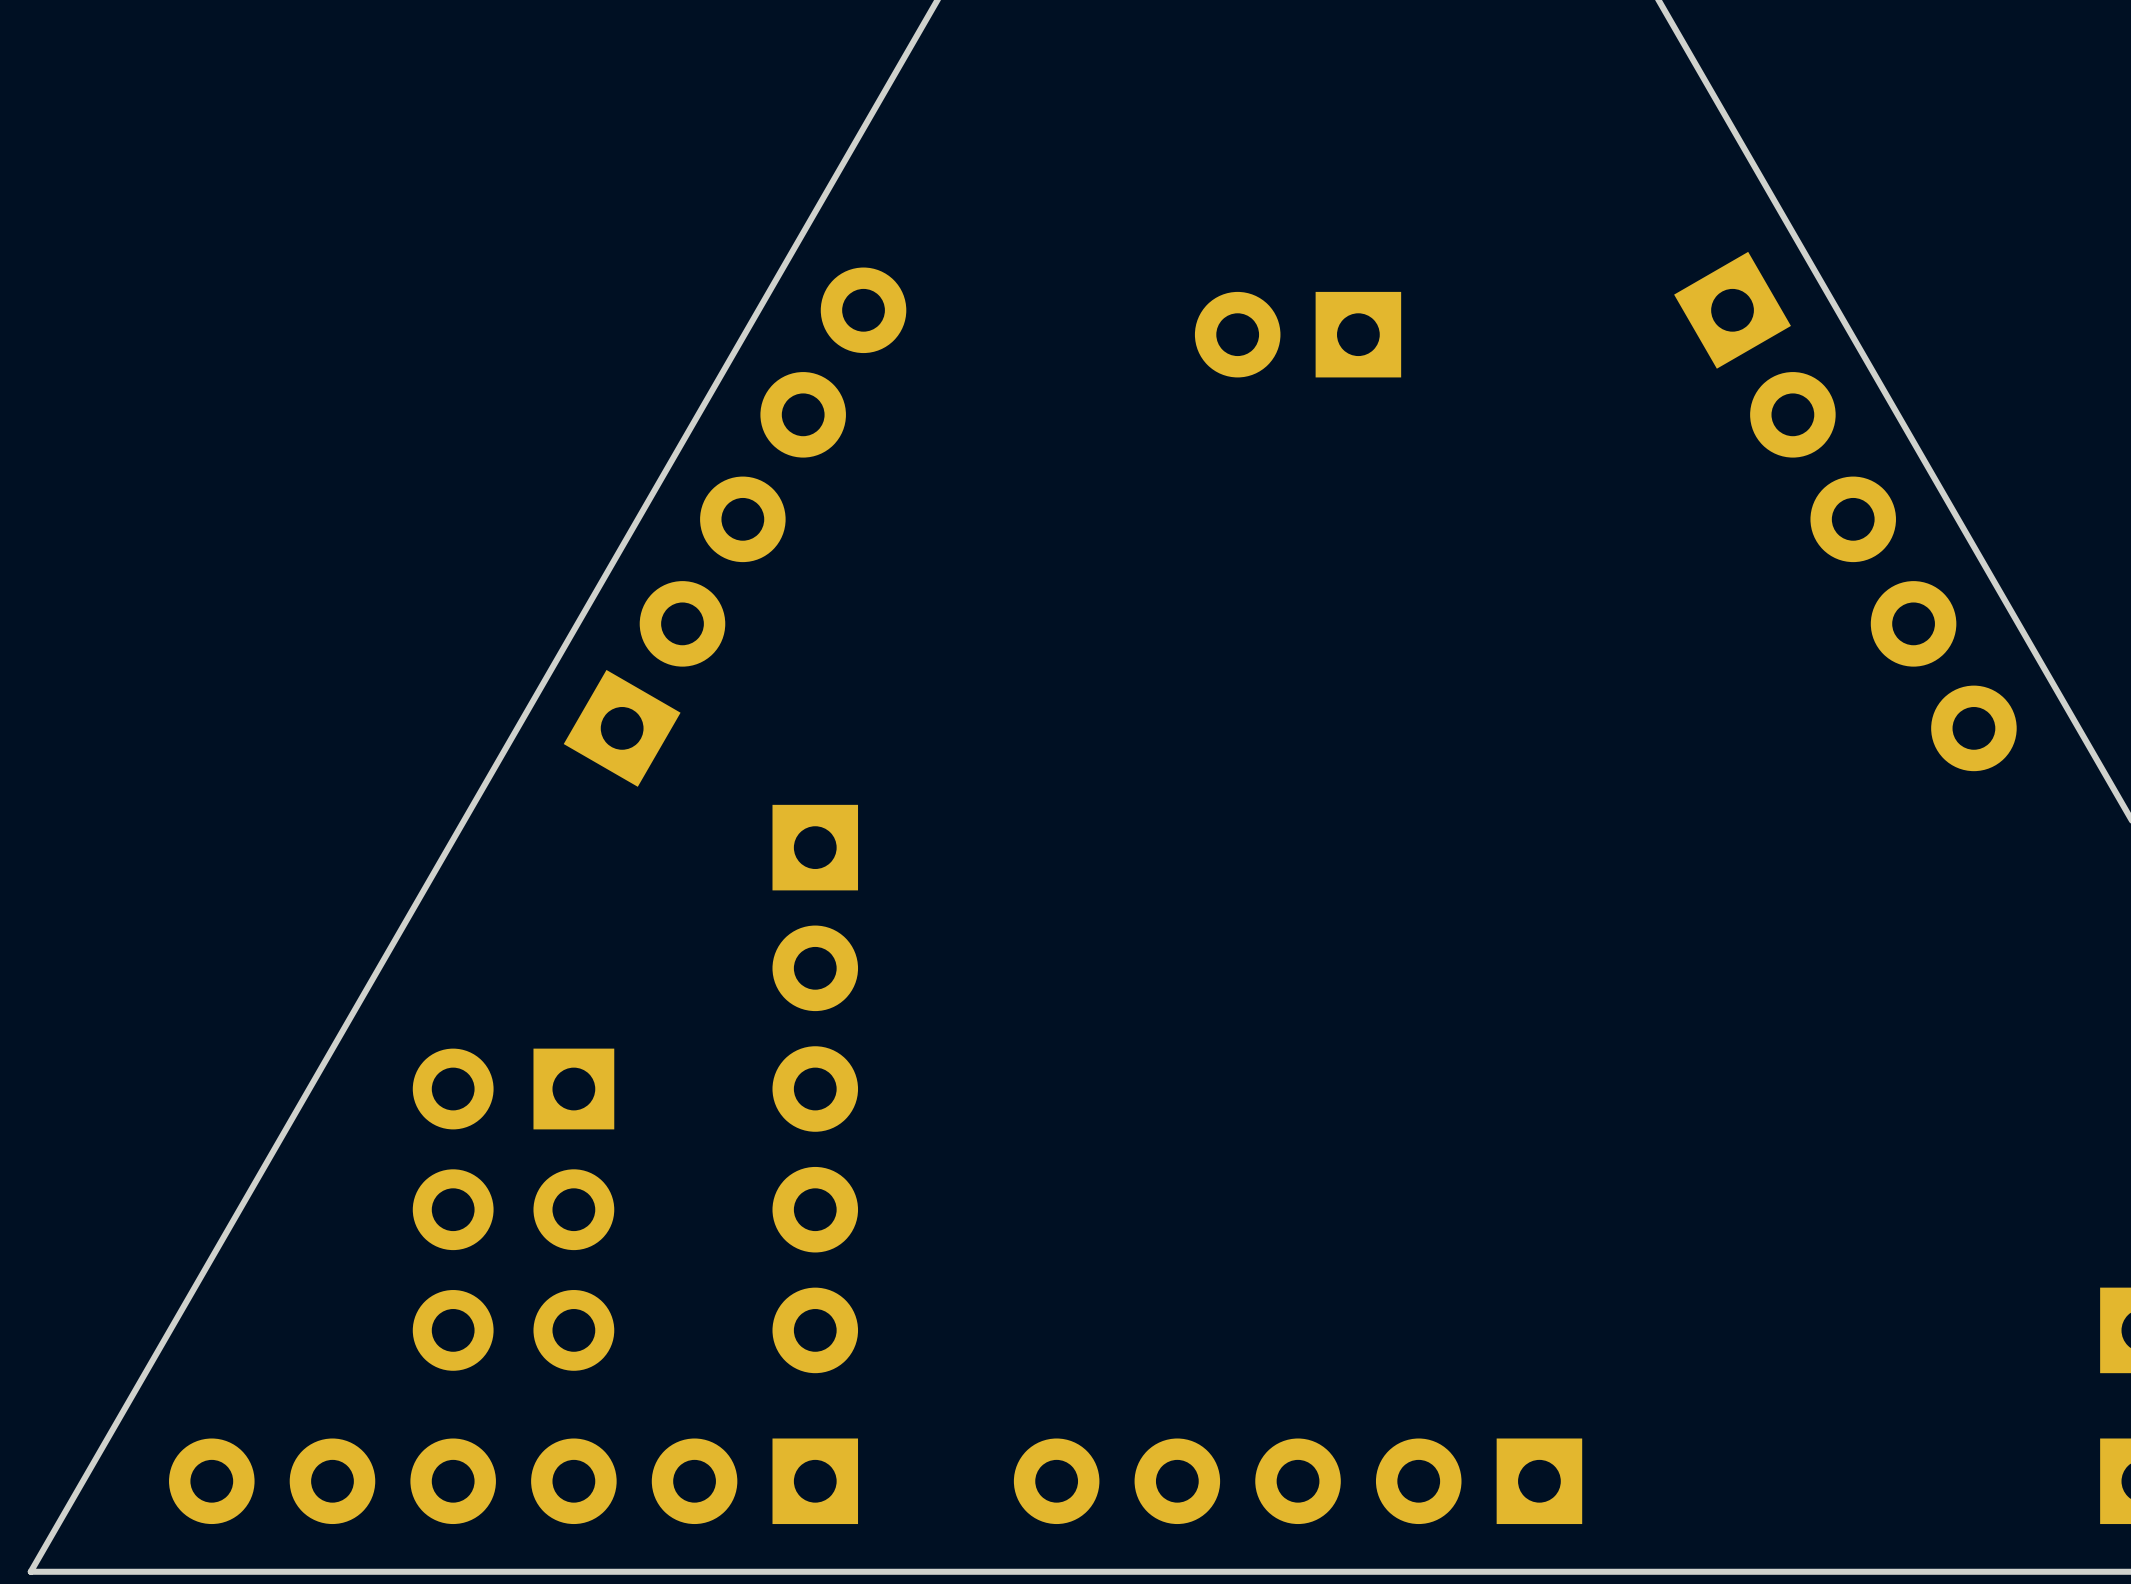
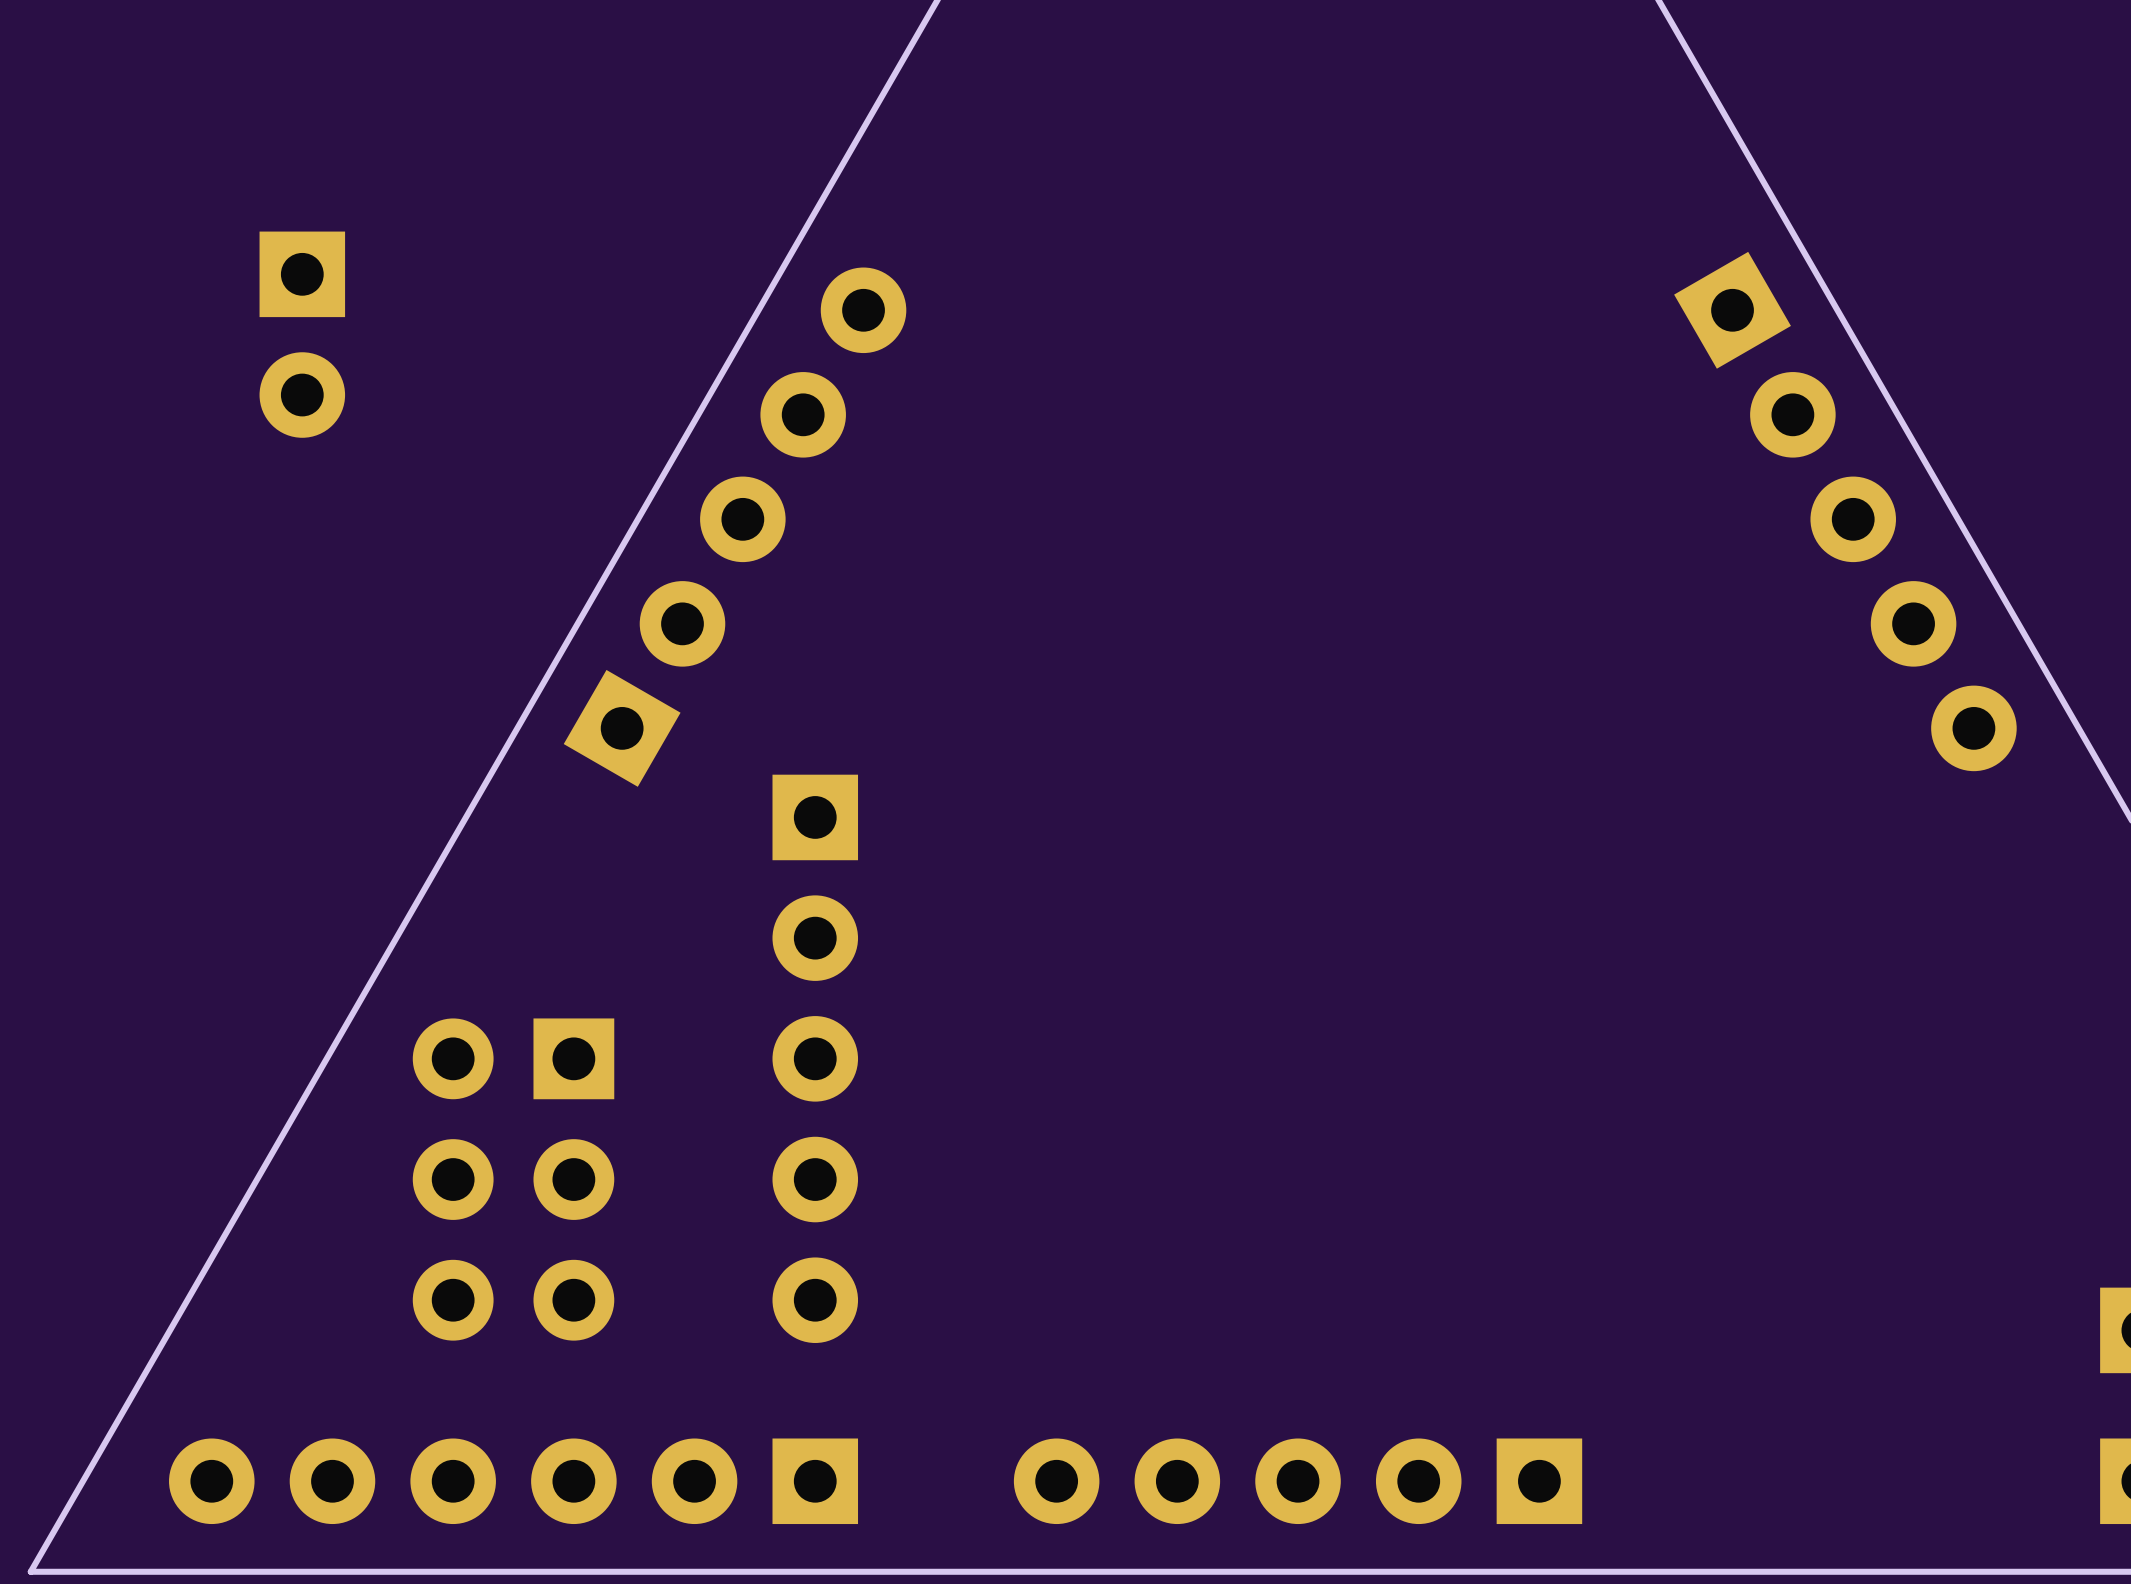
part rotation: 0° (1298, 334) -> 90° counterclockwise (302, 334)
part position: (1298, 334) -> (302, 334)
part position: (815, 1089) -> (815, 1058)
part position: (513, 1209) -> (513, 1179)

